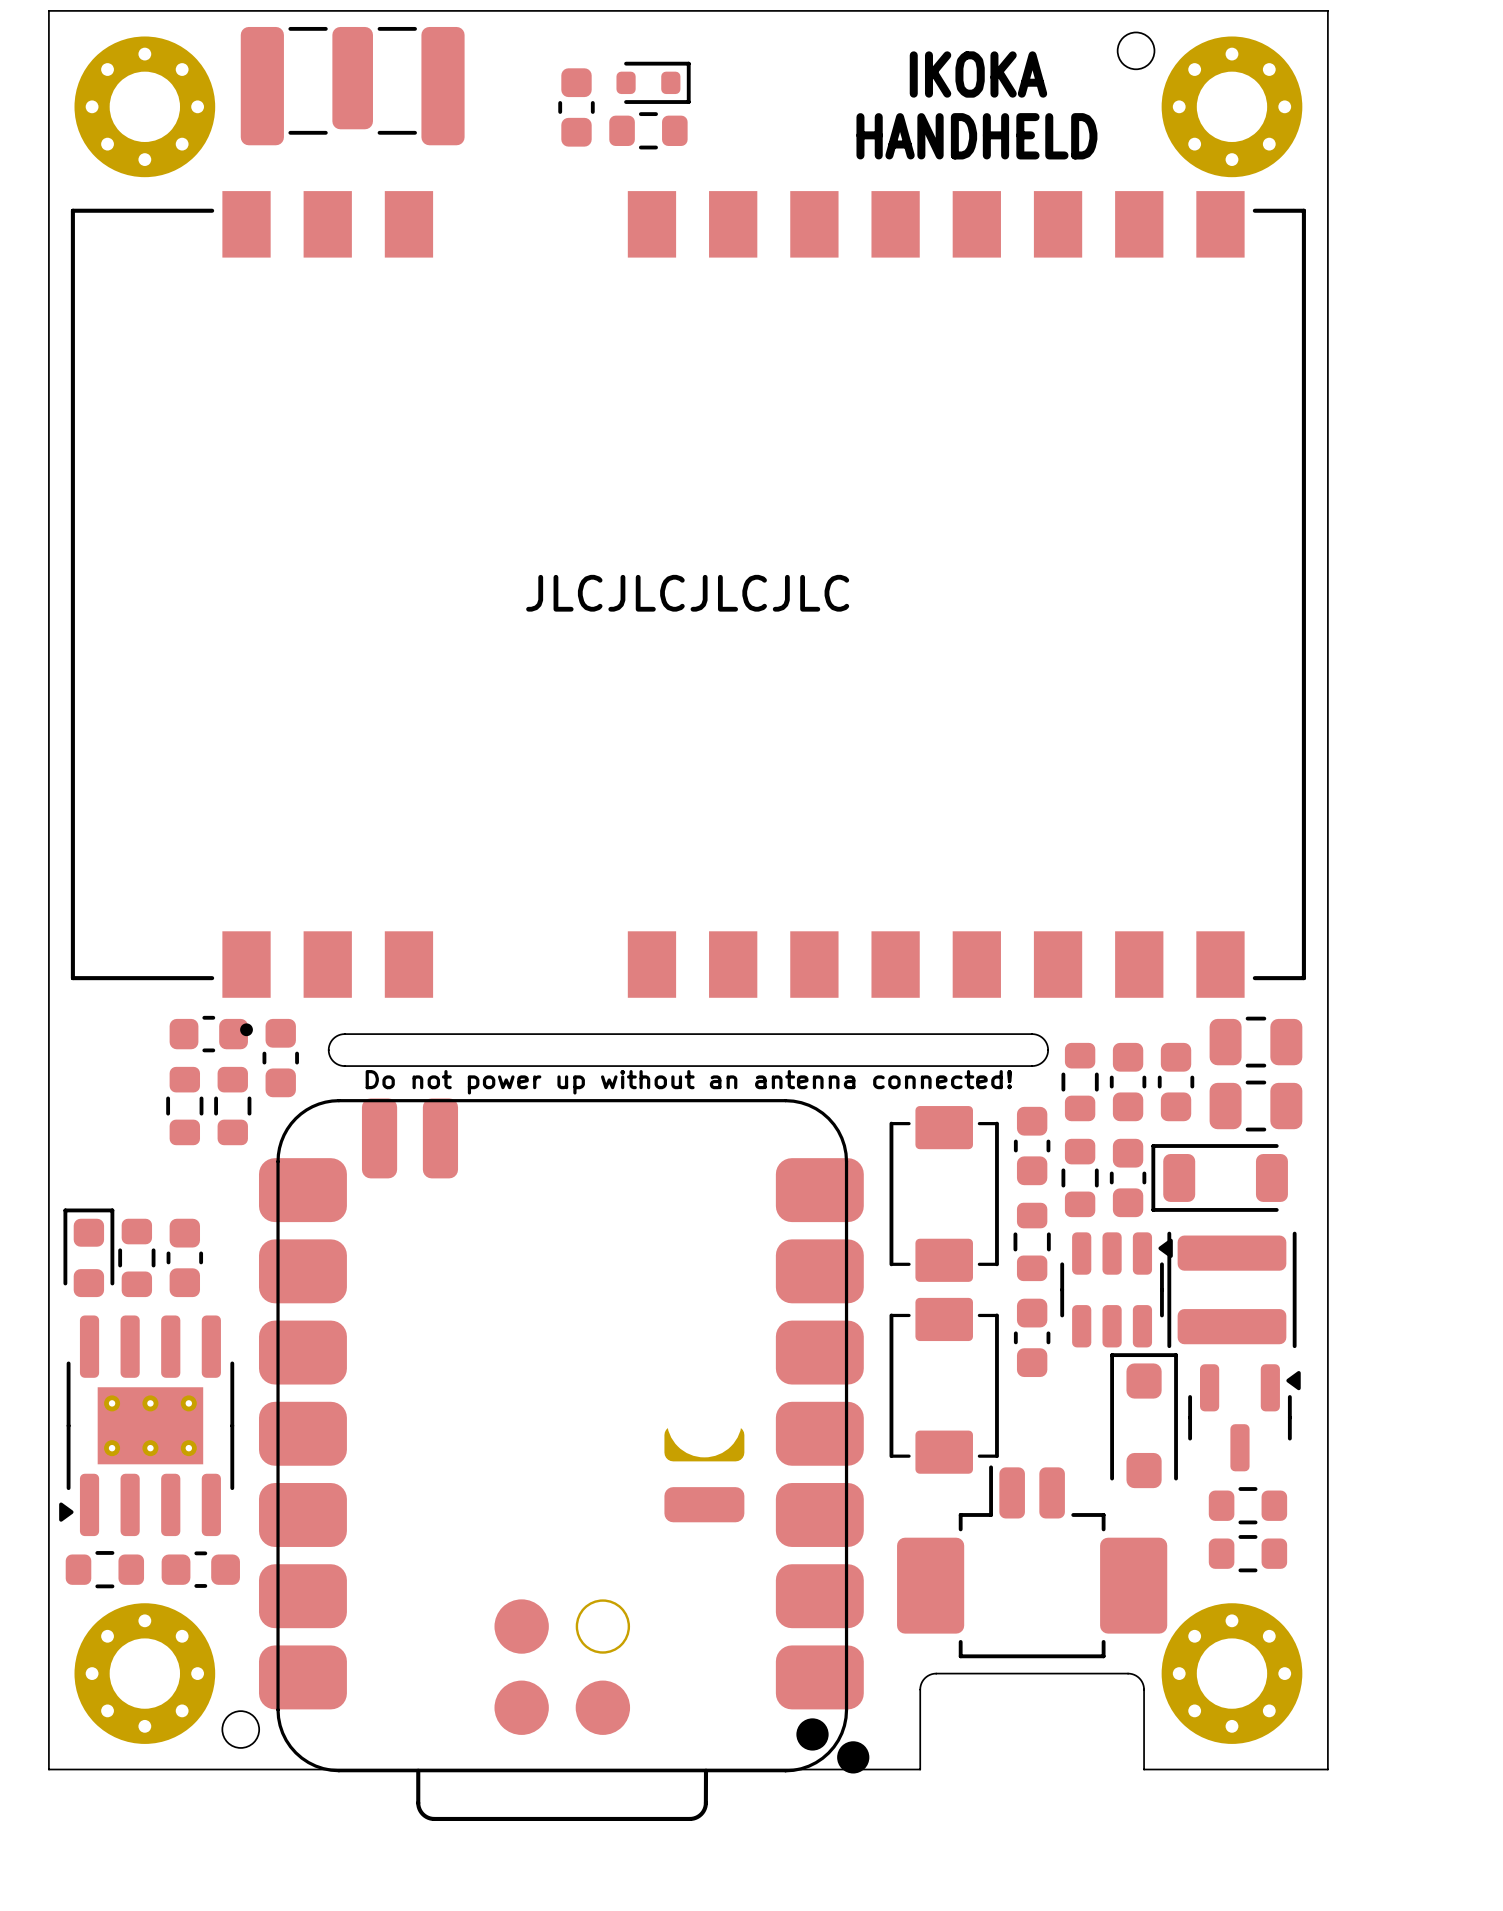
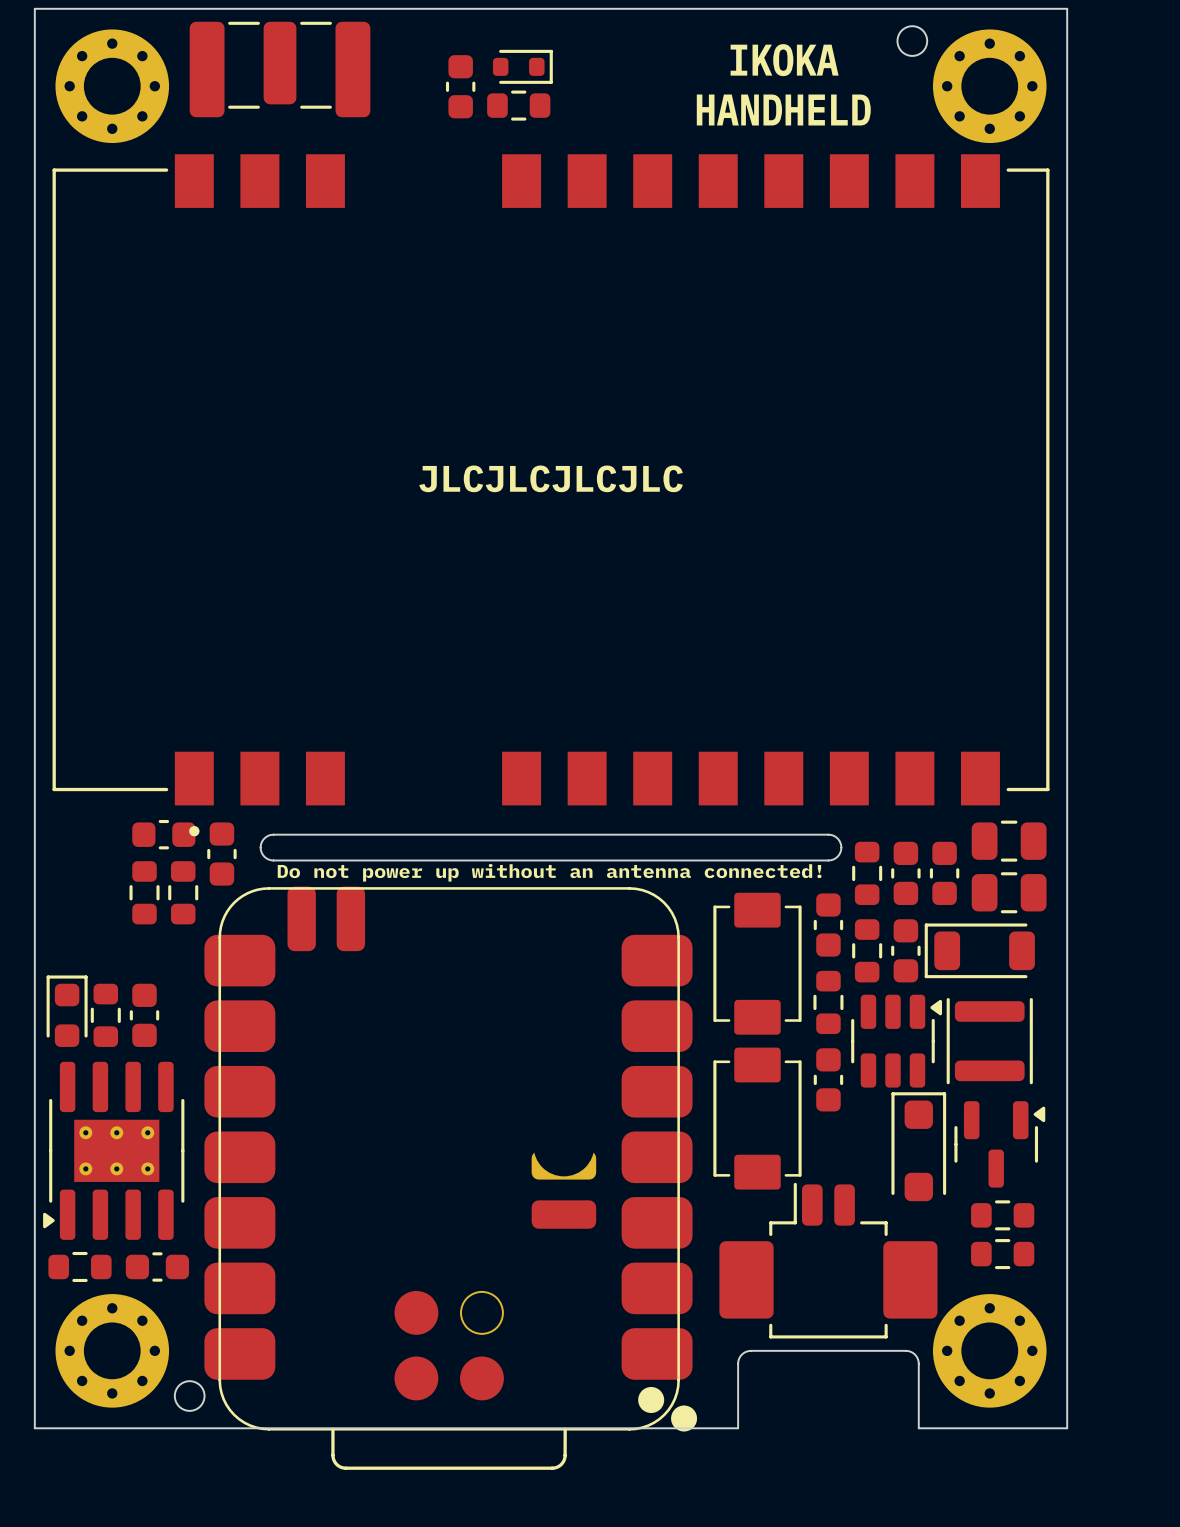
part footprint: [1167, 1231, 1297, 1349] -> [946, 998, 1033, 1085]

